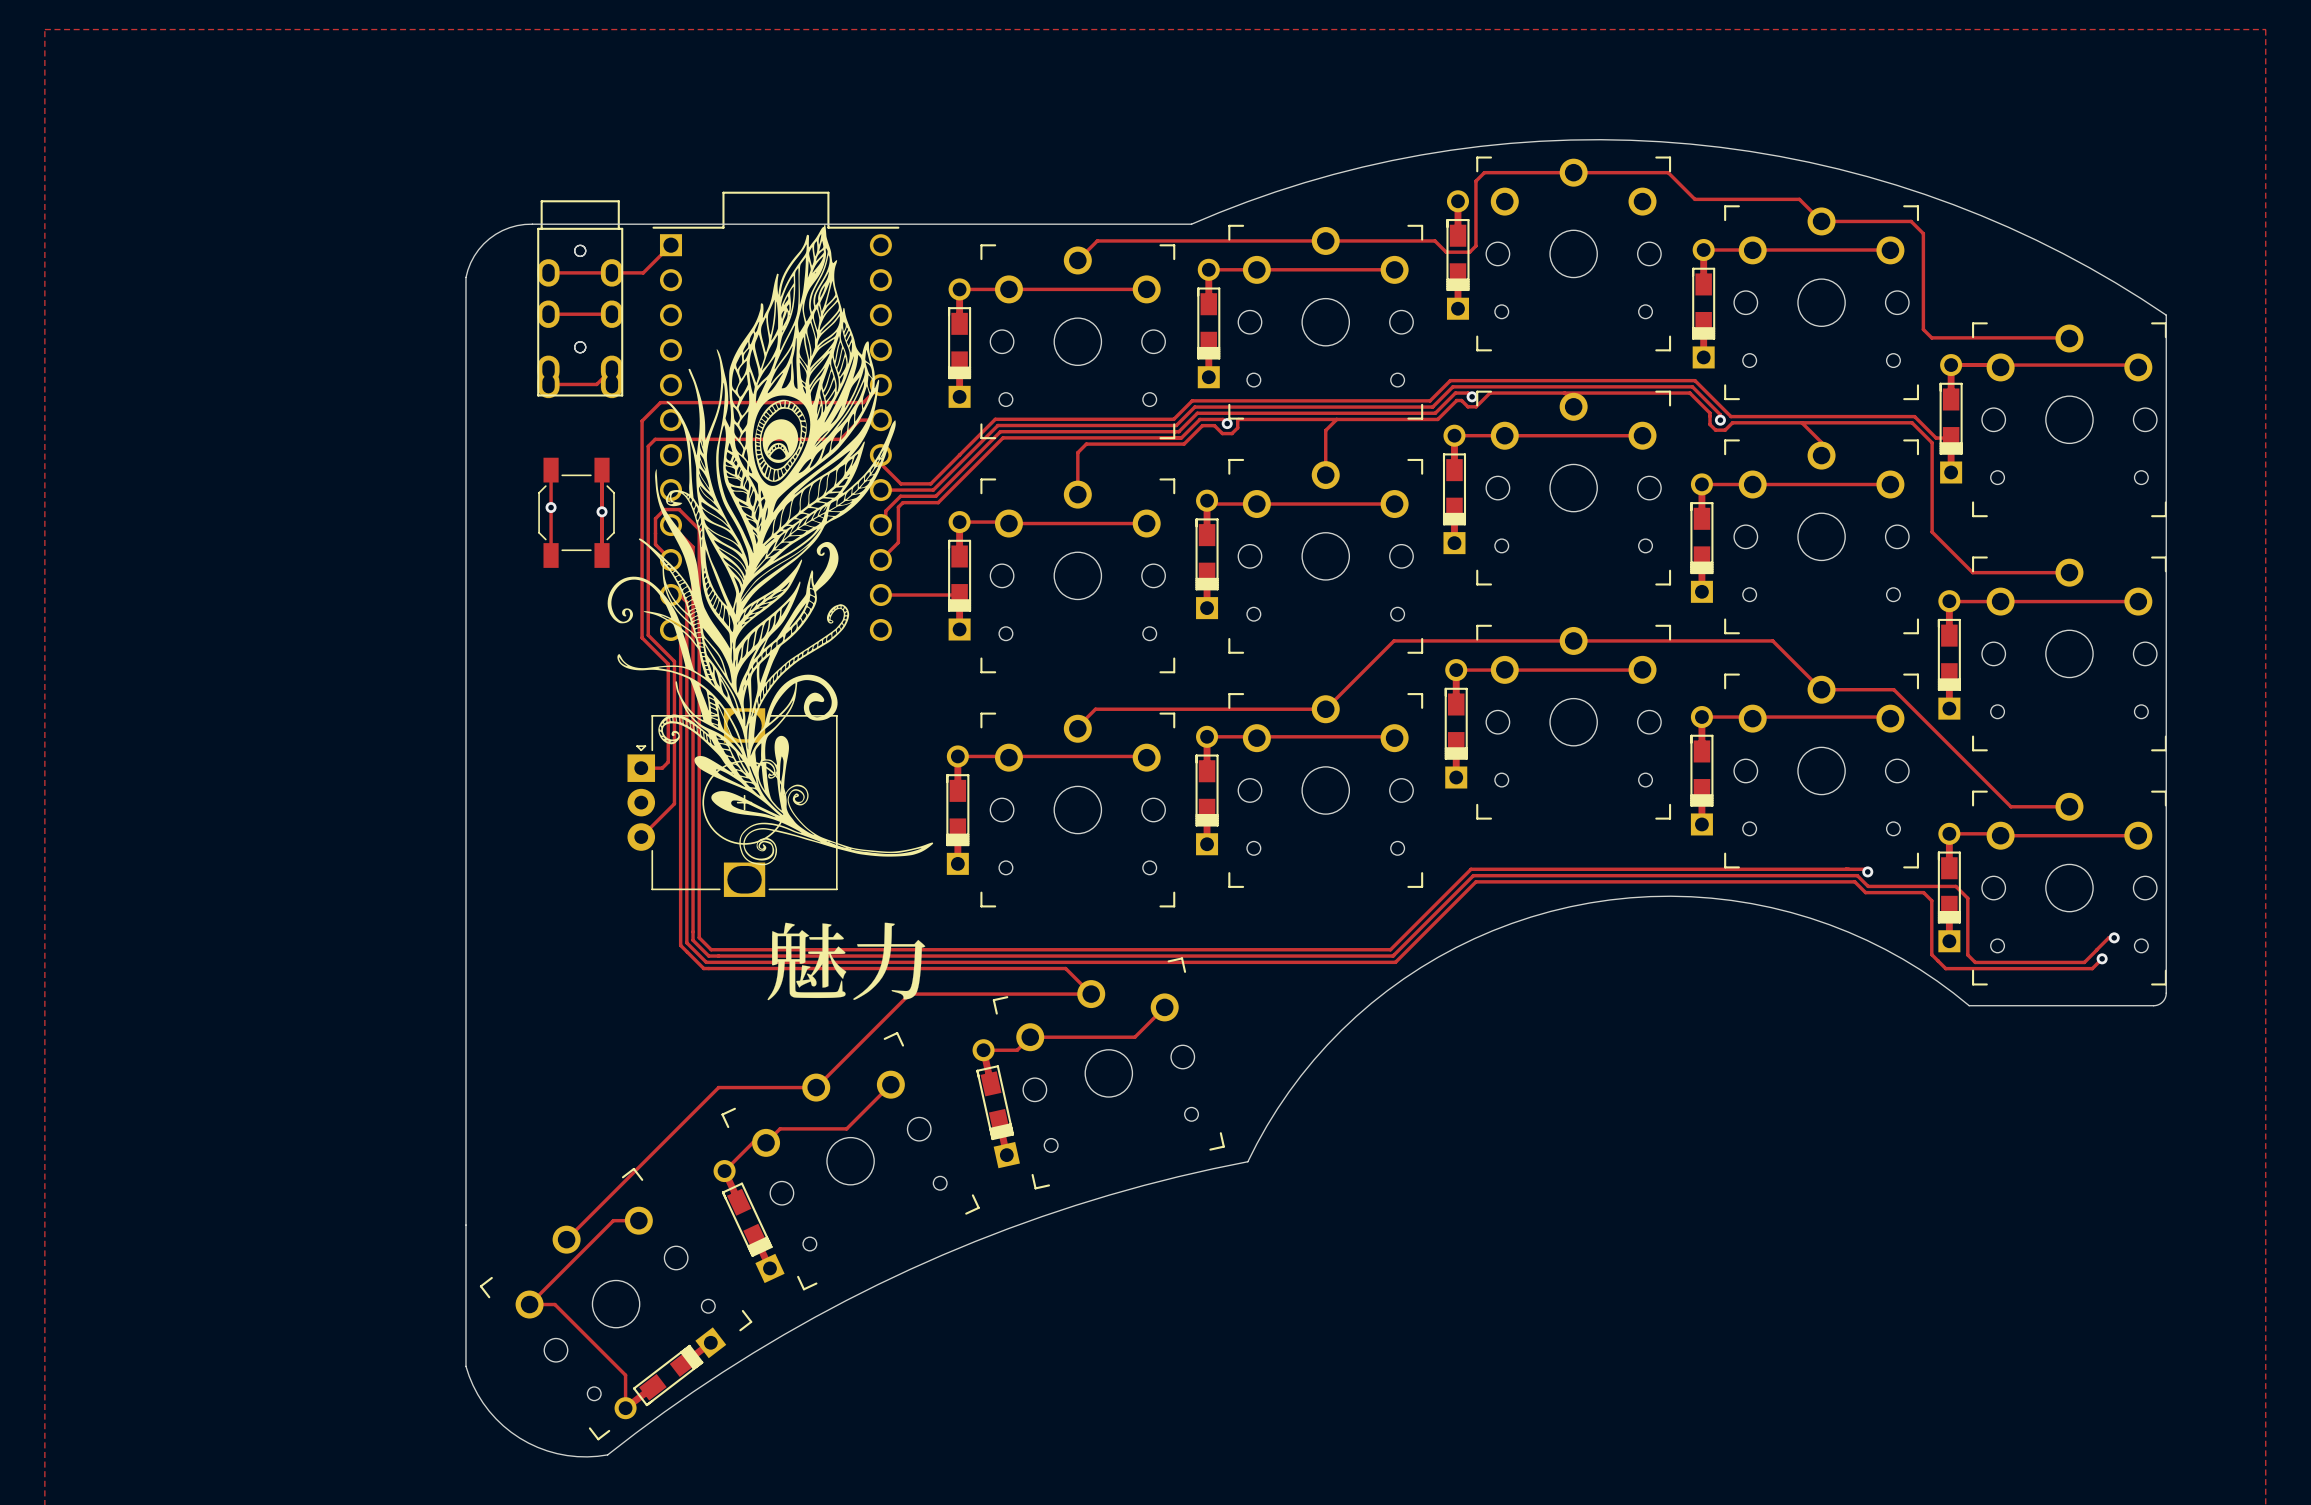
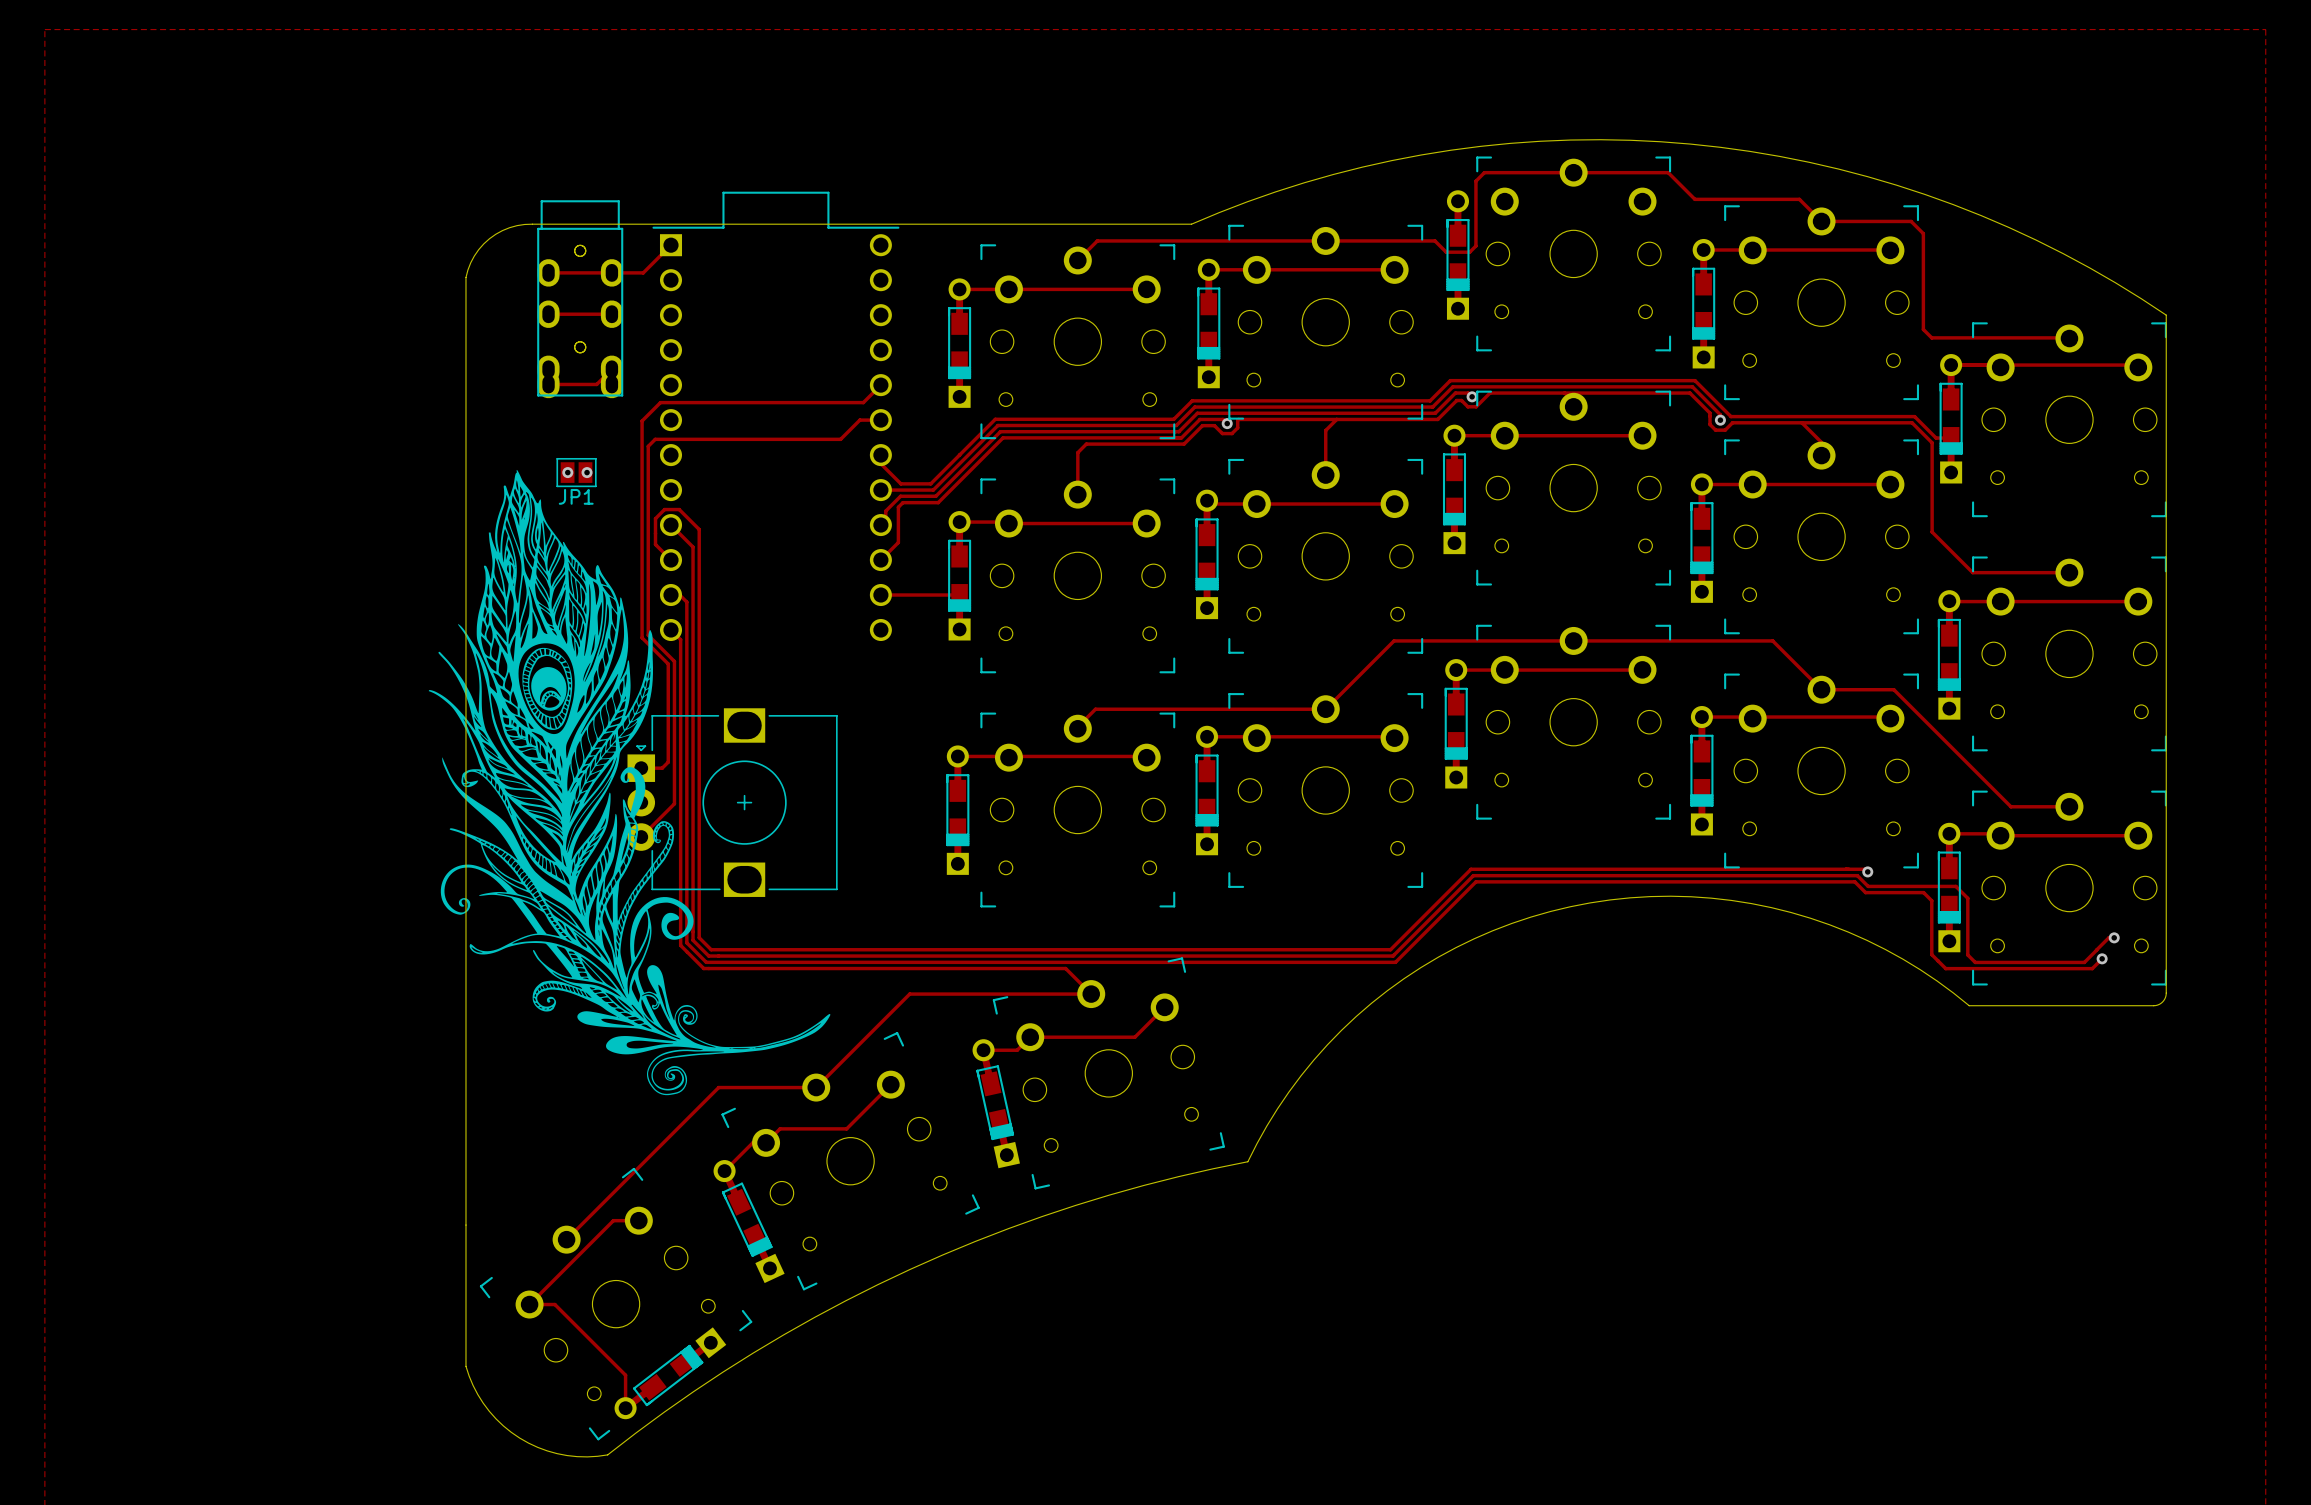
drawing: [607, 224, 934, 866] -> none
drawing: none -> [428, 469, 831, 1096]
track: (551, 470) (551, 555) -> none
track: (602, 470) (602, 555) -> none
via: none -> (567, 472)
JP1: none -> (576, 472)
via: none -> (587, 472)
via: (551, 507) -> none
via: (602, 511) -> none
part: (576, 512) -> none
drawing: [767, 922, 926, 1001] -> none

